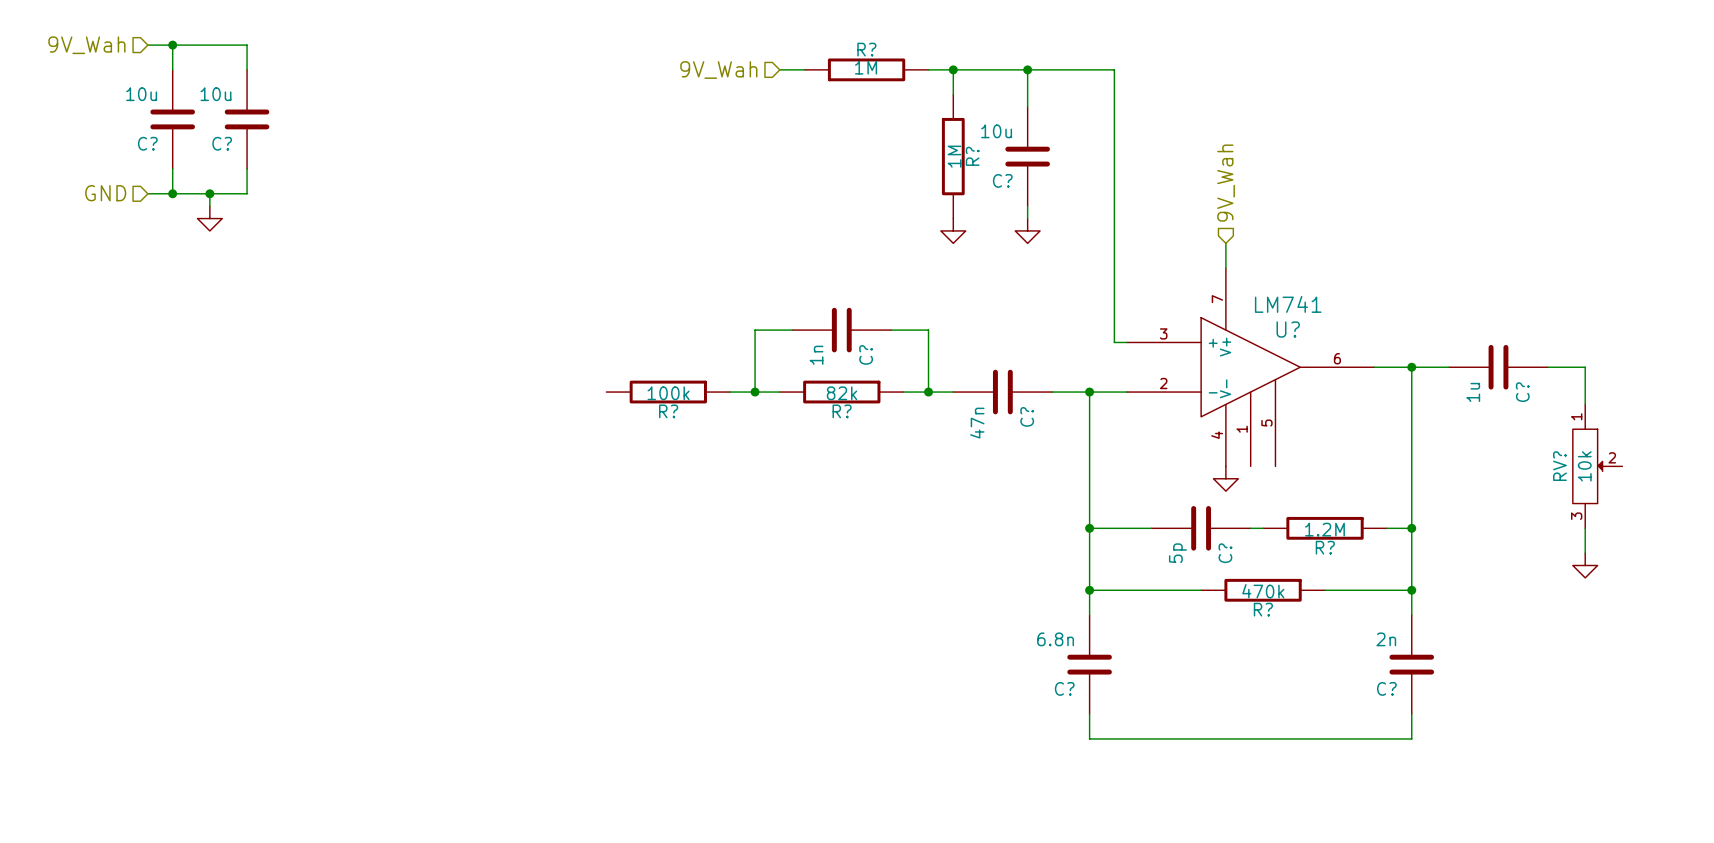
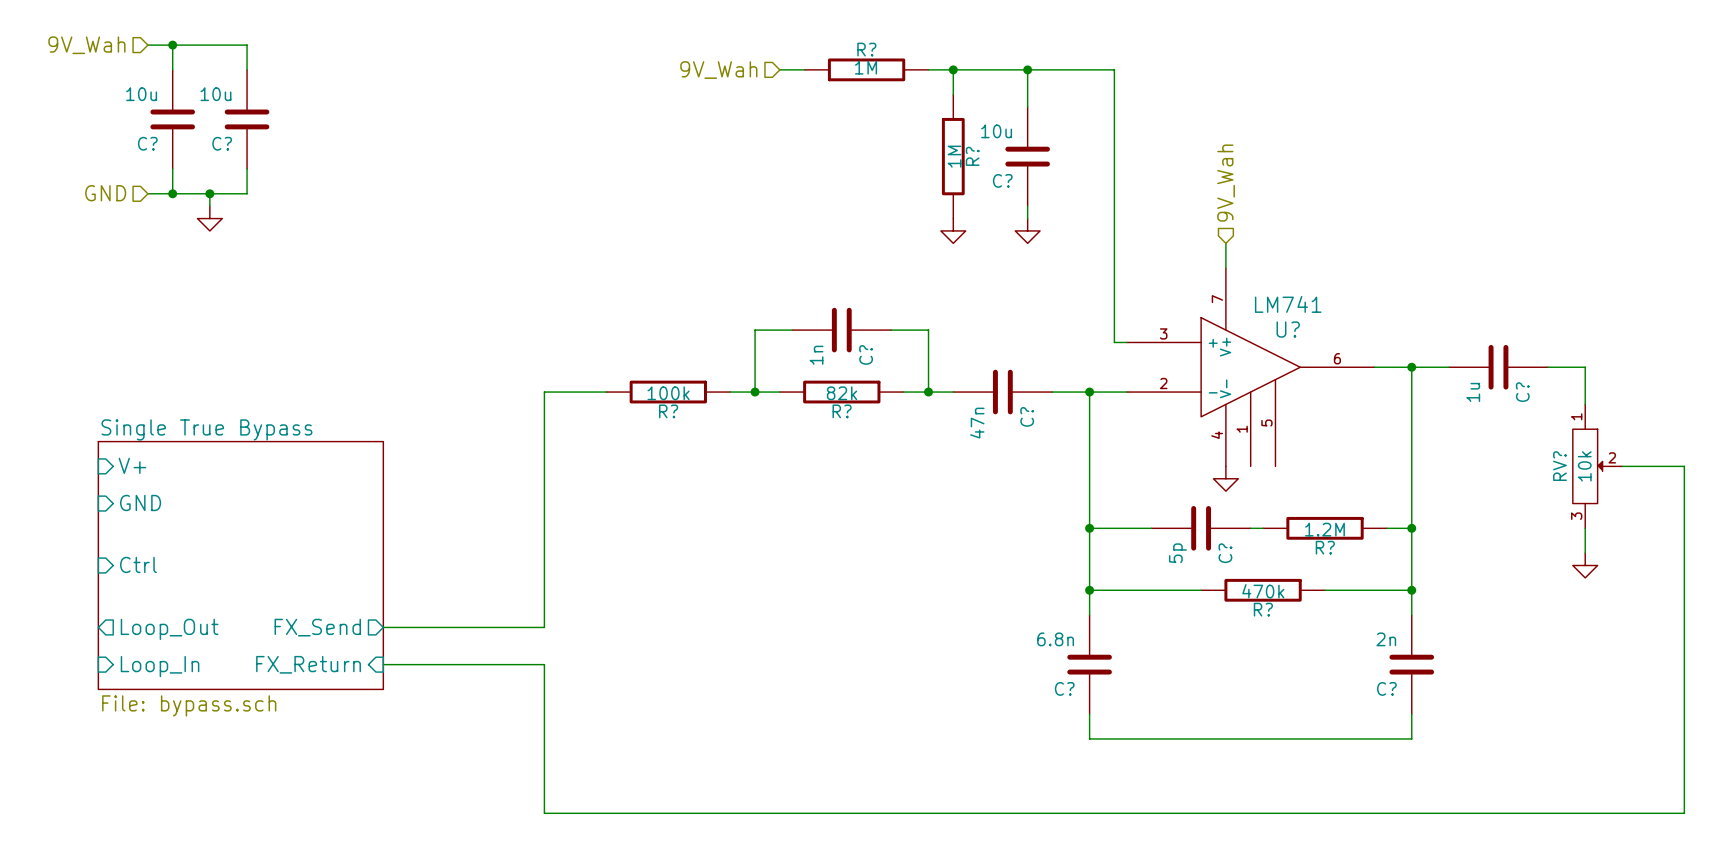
wire: none -> (606, 392) (544, 392) (544, 627) (383, 627)
sheet pin: none -> V+ (132, 465)
wire: none -> (1622, 466) (1684, 466) (1684, 813) (544, 813) (544, 664) (383, 664)
sheet pin: none -> GND (140, 502)
sheet pin: none -> Ctrl (138, 564)
sheet Single True Bypass: none -> File: bypass.sch (240, 565)
sheet pin: none -> FX_Send (317, 627)
sheet pin: none -> Loop_Out (169, 629)
sheet pin: none -> FX_Return (308, 664)
sheet pin: none -> Loop_In (160, 666)

